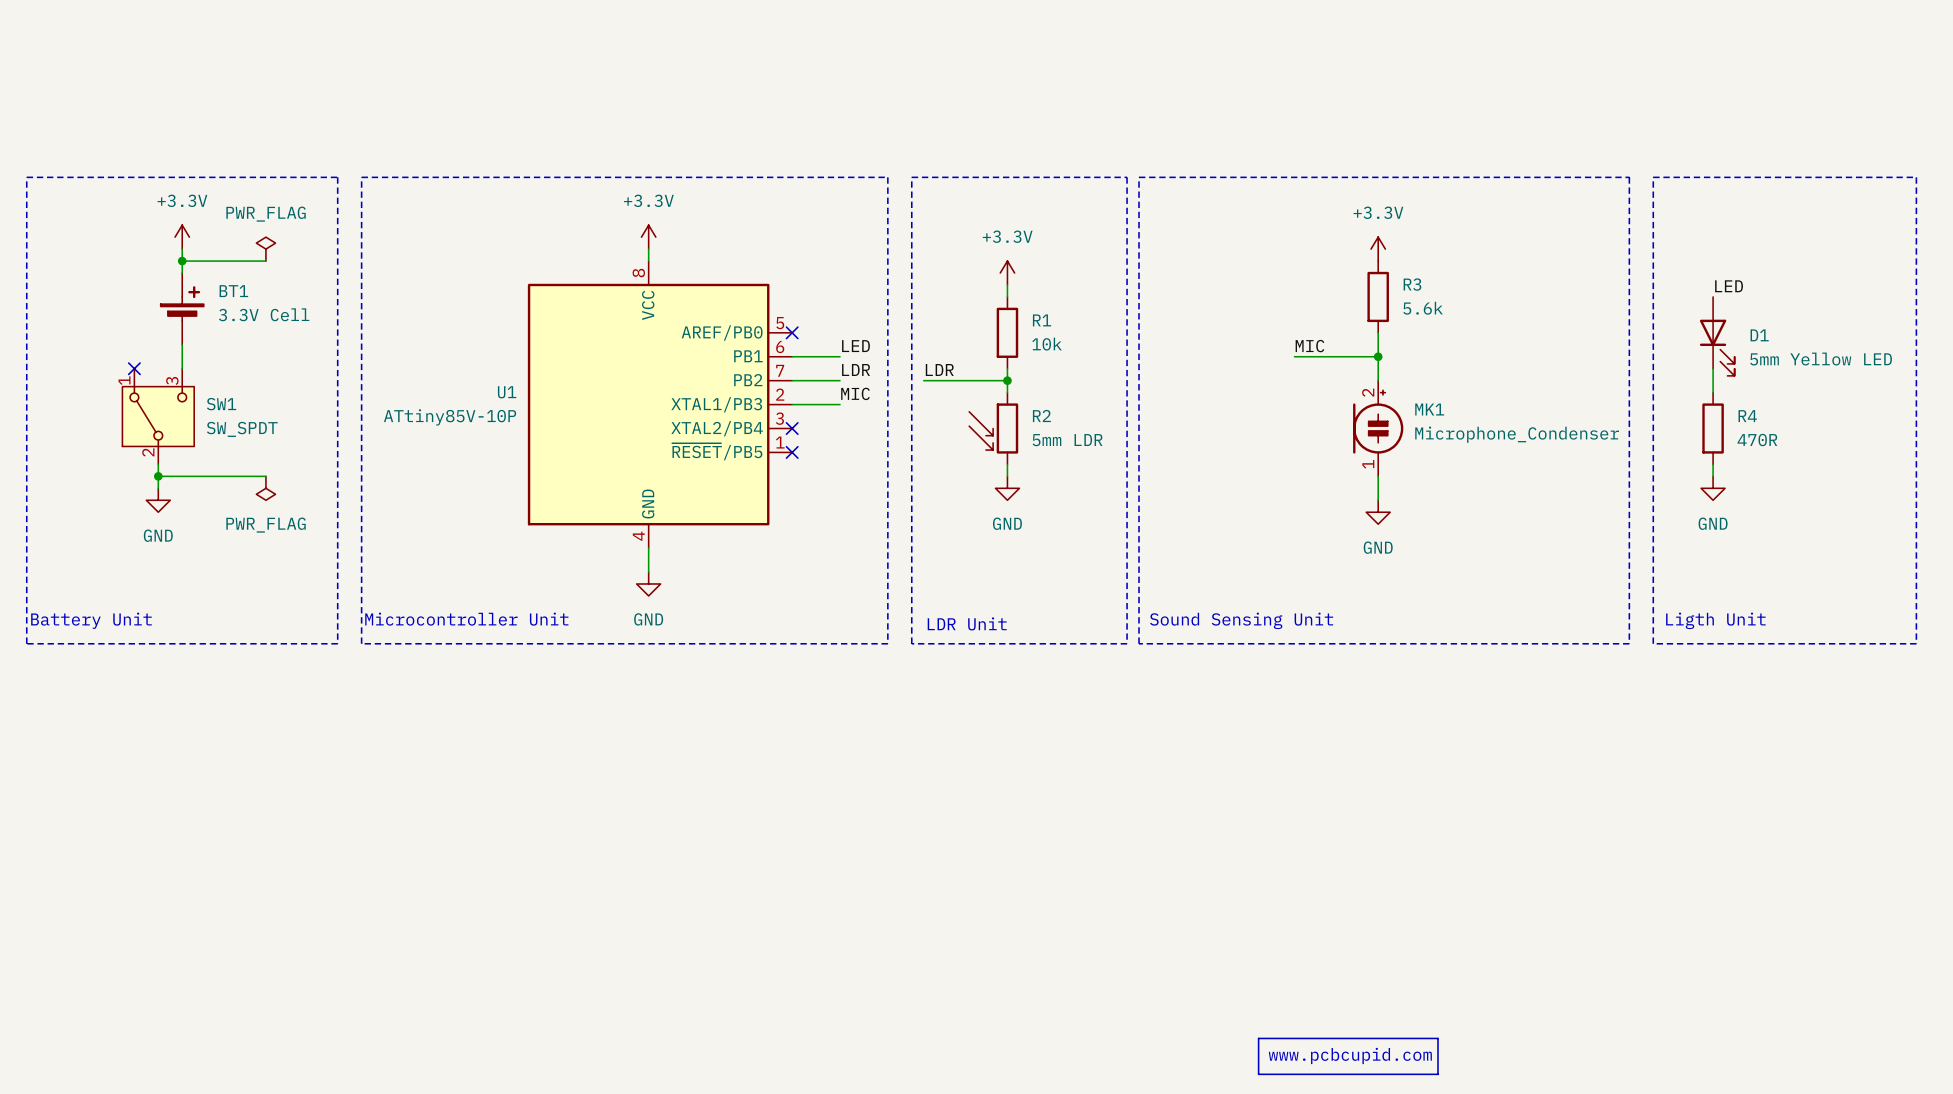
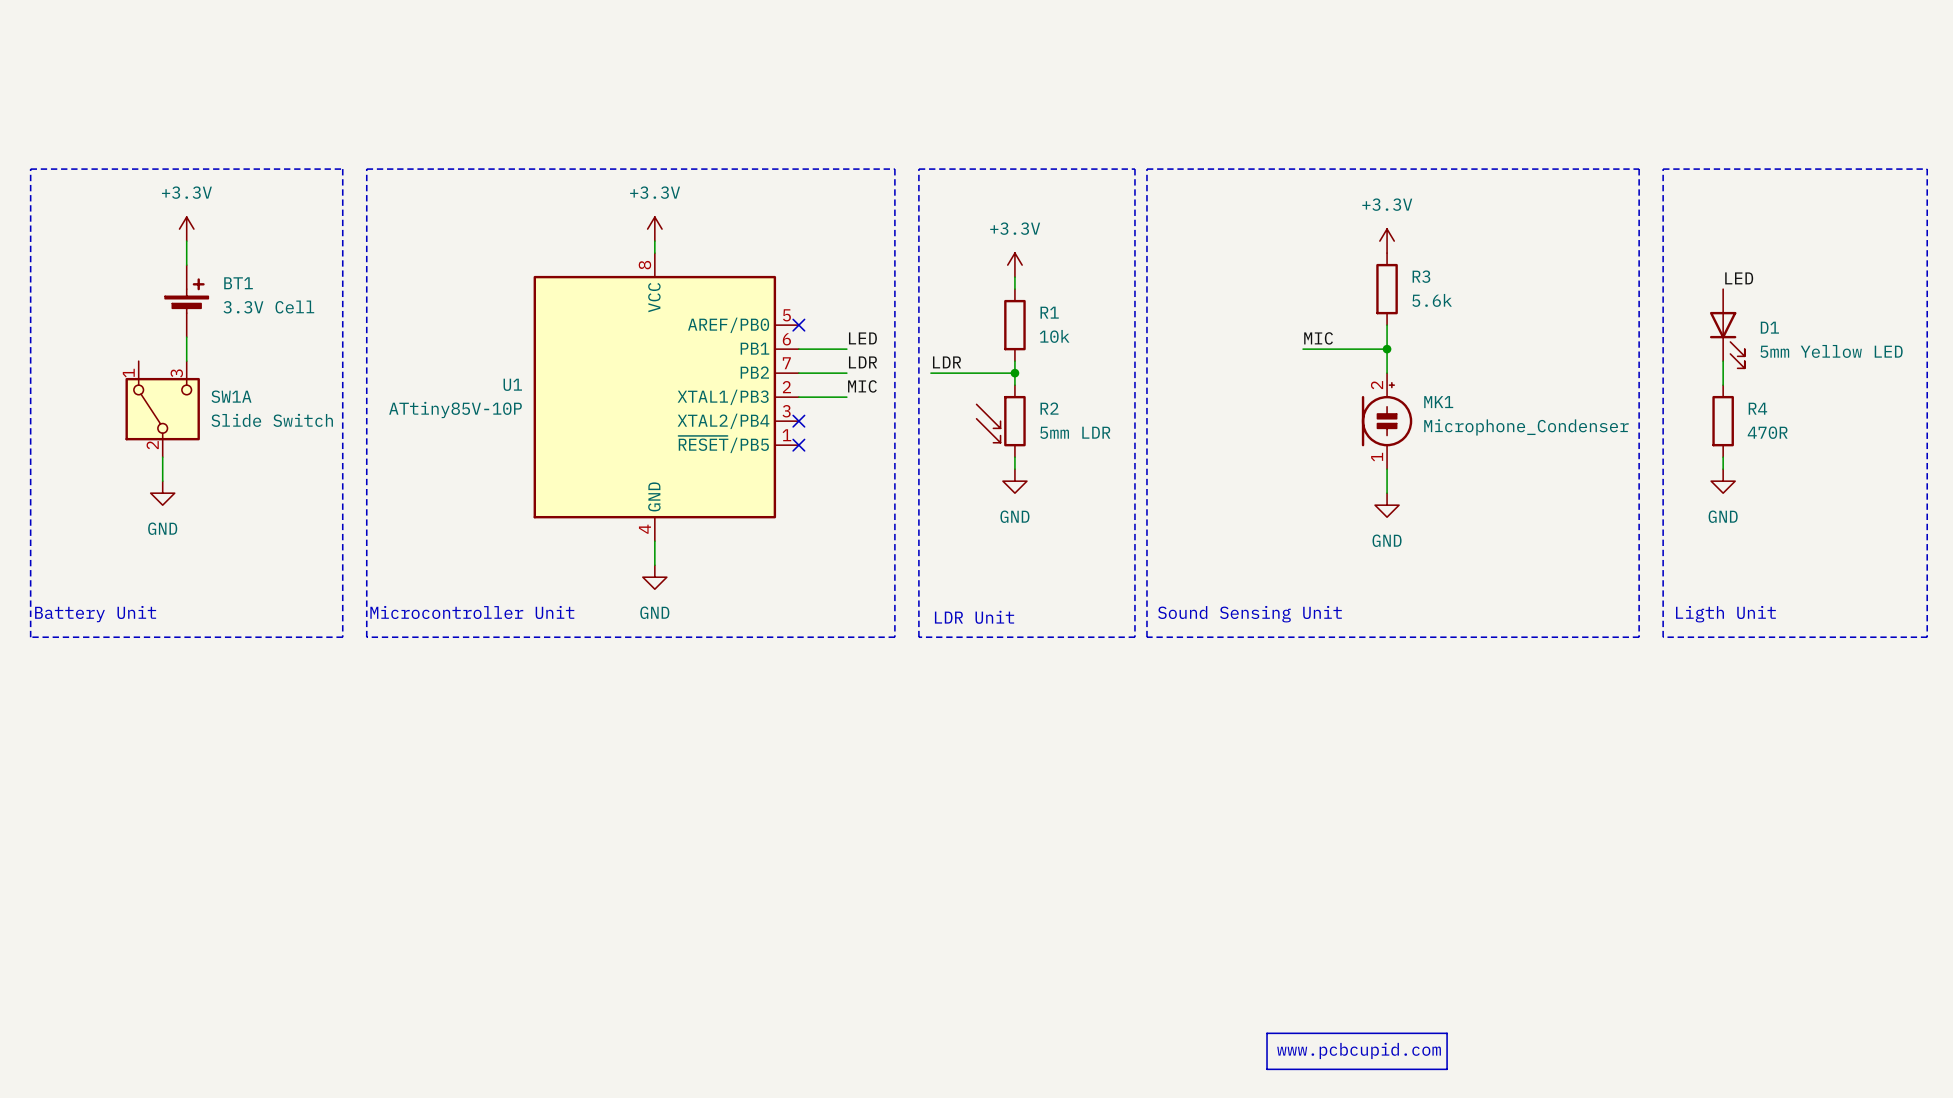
power symbol: PWR_FLAG (265, 249) -> none
wire: (182, 261) (265, 261) -> none
junction: (182, 261) -> none
no-connect mark: (134, 368) -> none
SW1: SW_SPDT (158, 416) -> none
SW1A: none -> Slide Switch (162, 409)
wire: (158, 476) (265, 476) -> none
junction: (158, 476) -> none
power symbol: PWR_FLAG (265, 488) -> none

